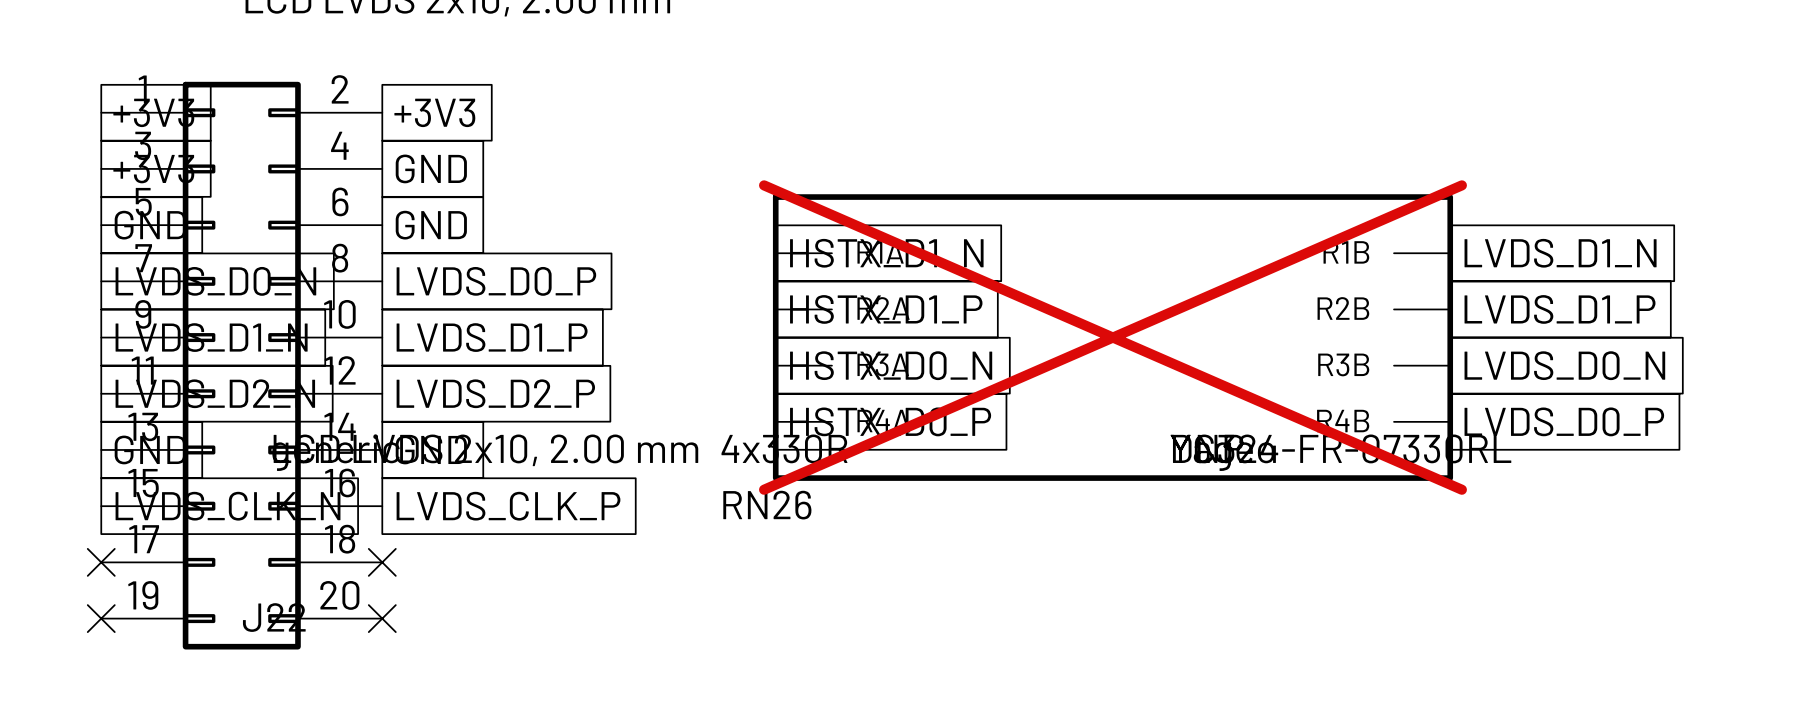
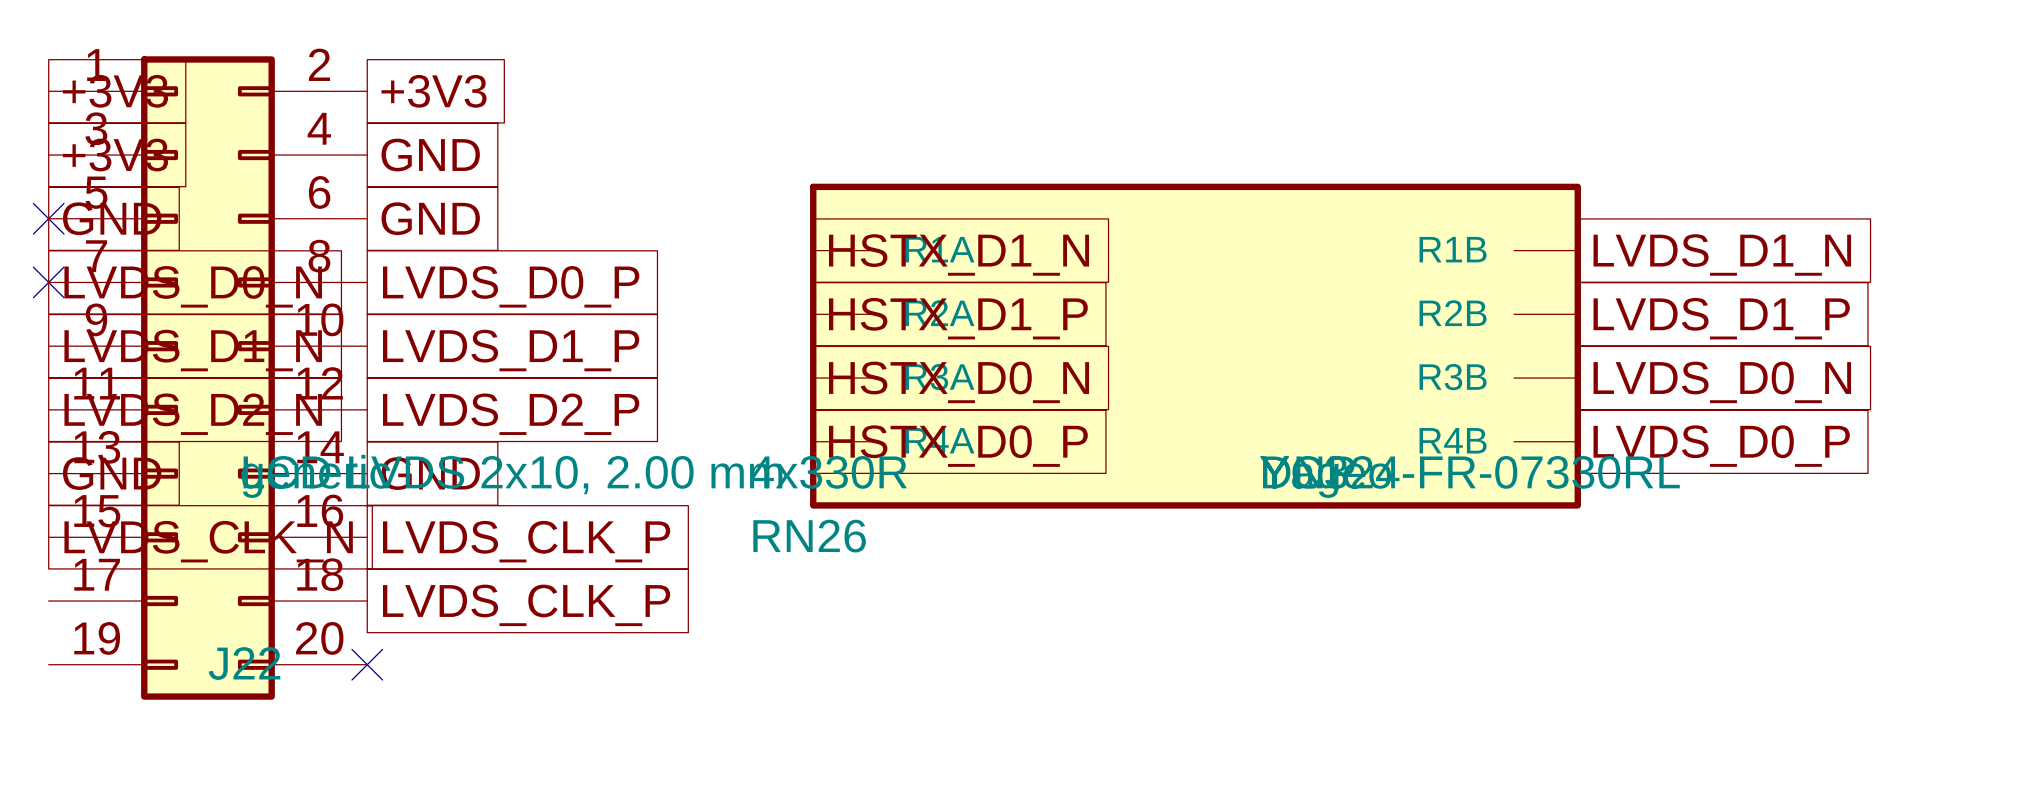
no-connect mark: none -> (48, 218)
no-connect mark: none -> (48, 282)
RN26 do-not-place cross: (1112, 337) -> none
no-connect mark: (101, 562) -> none
no-connect mark: (382, 562) -> none
global label: none -> LVDS_CLK_P (526, 605)
no-connect mark: (101, 618) -> none

